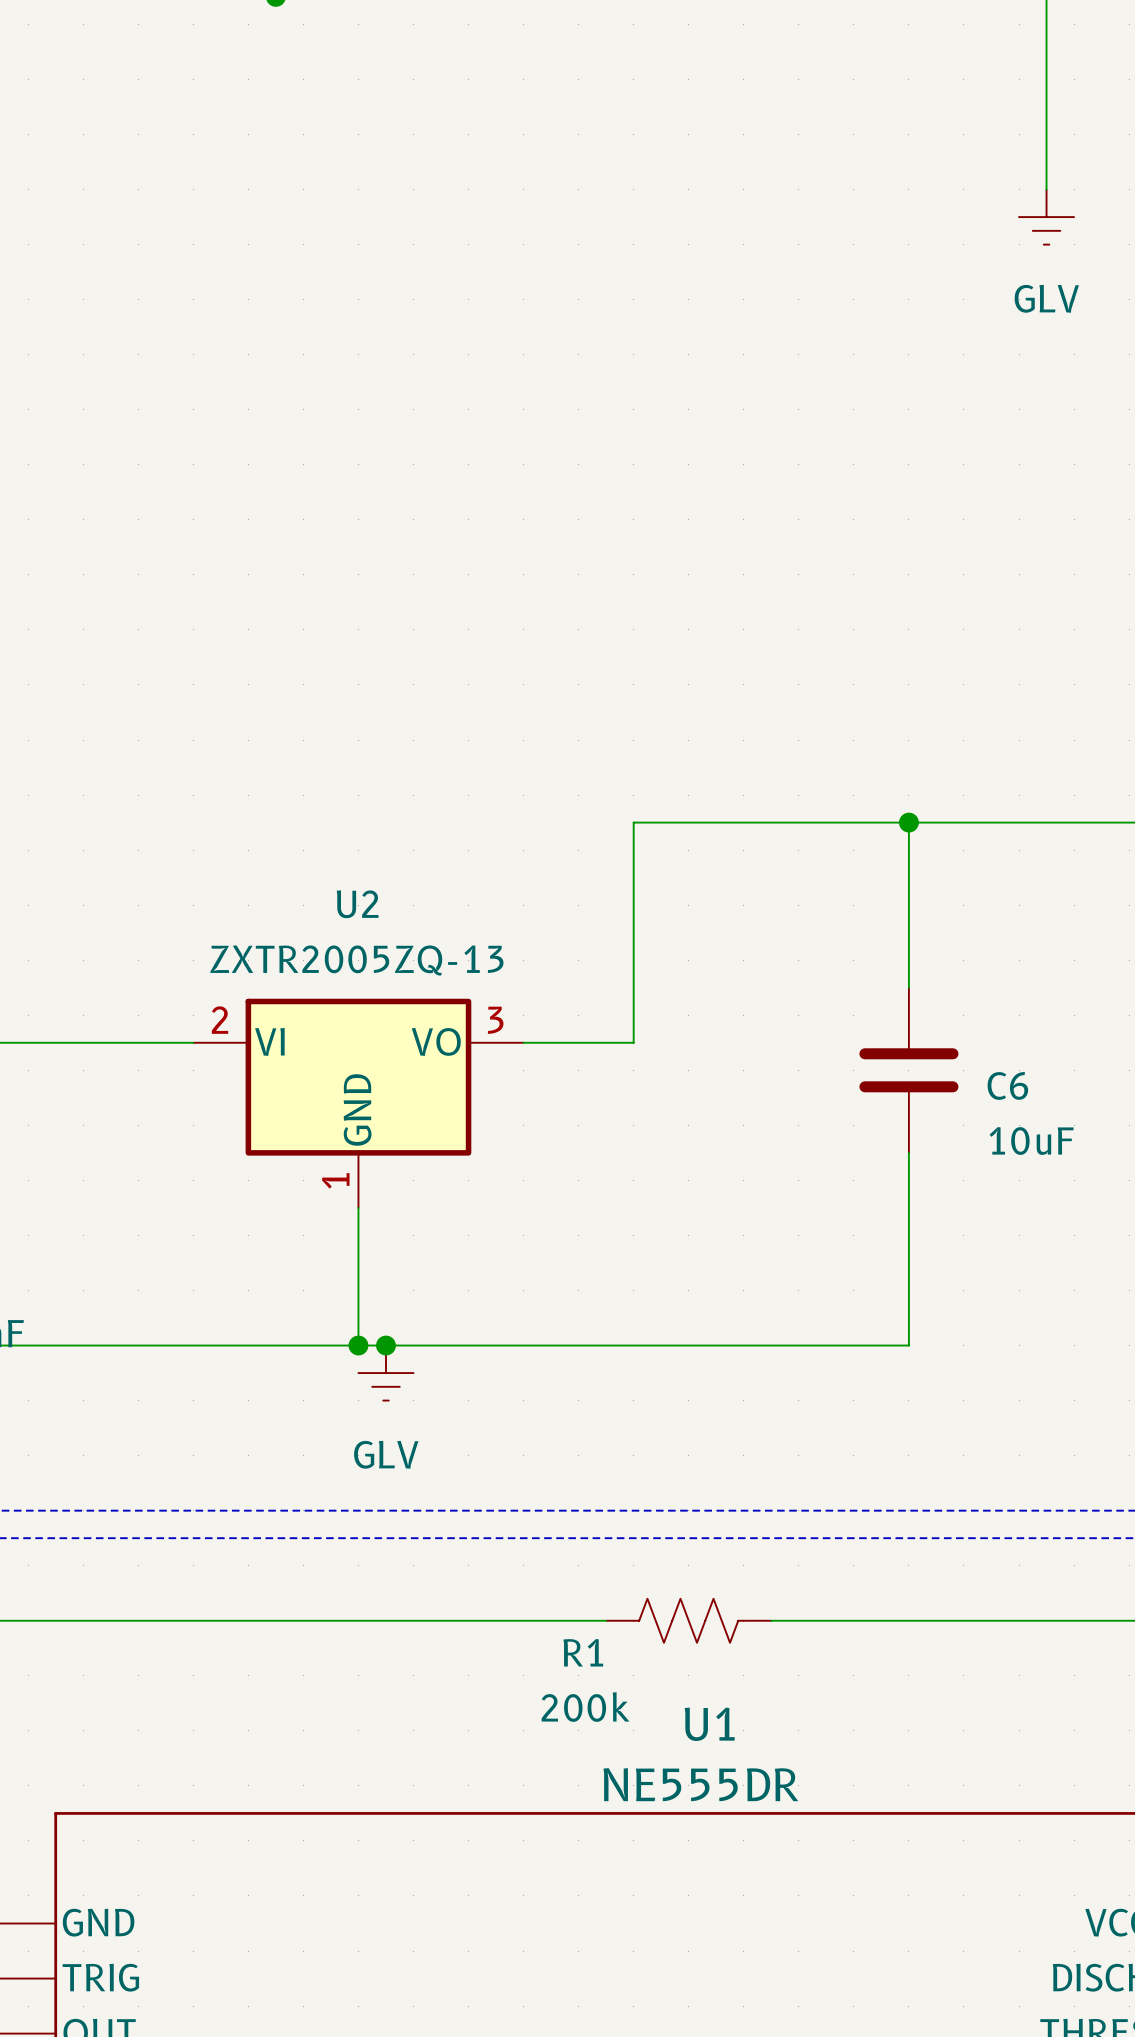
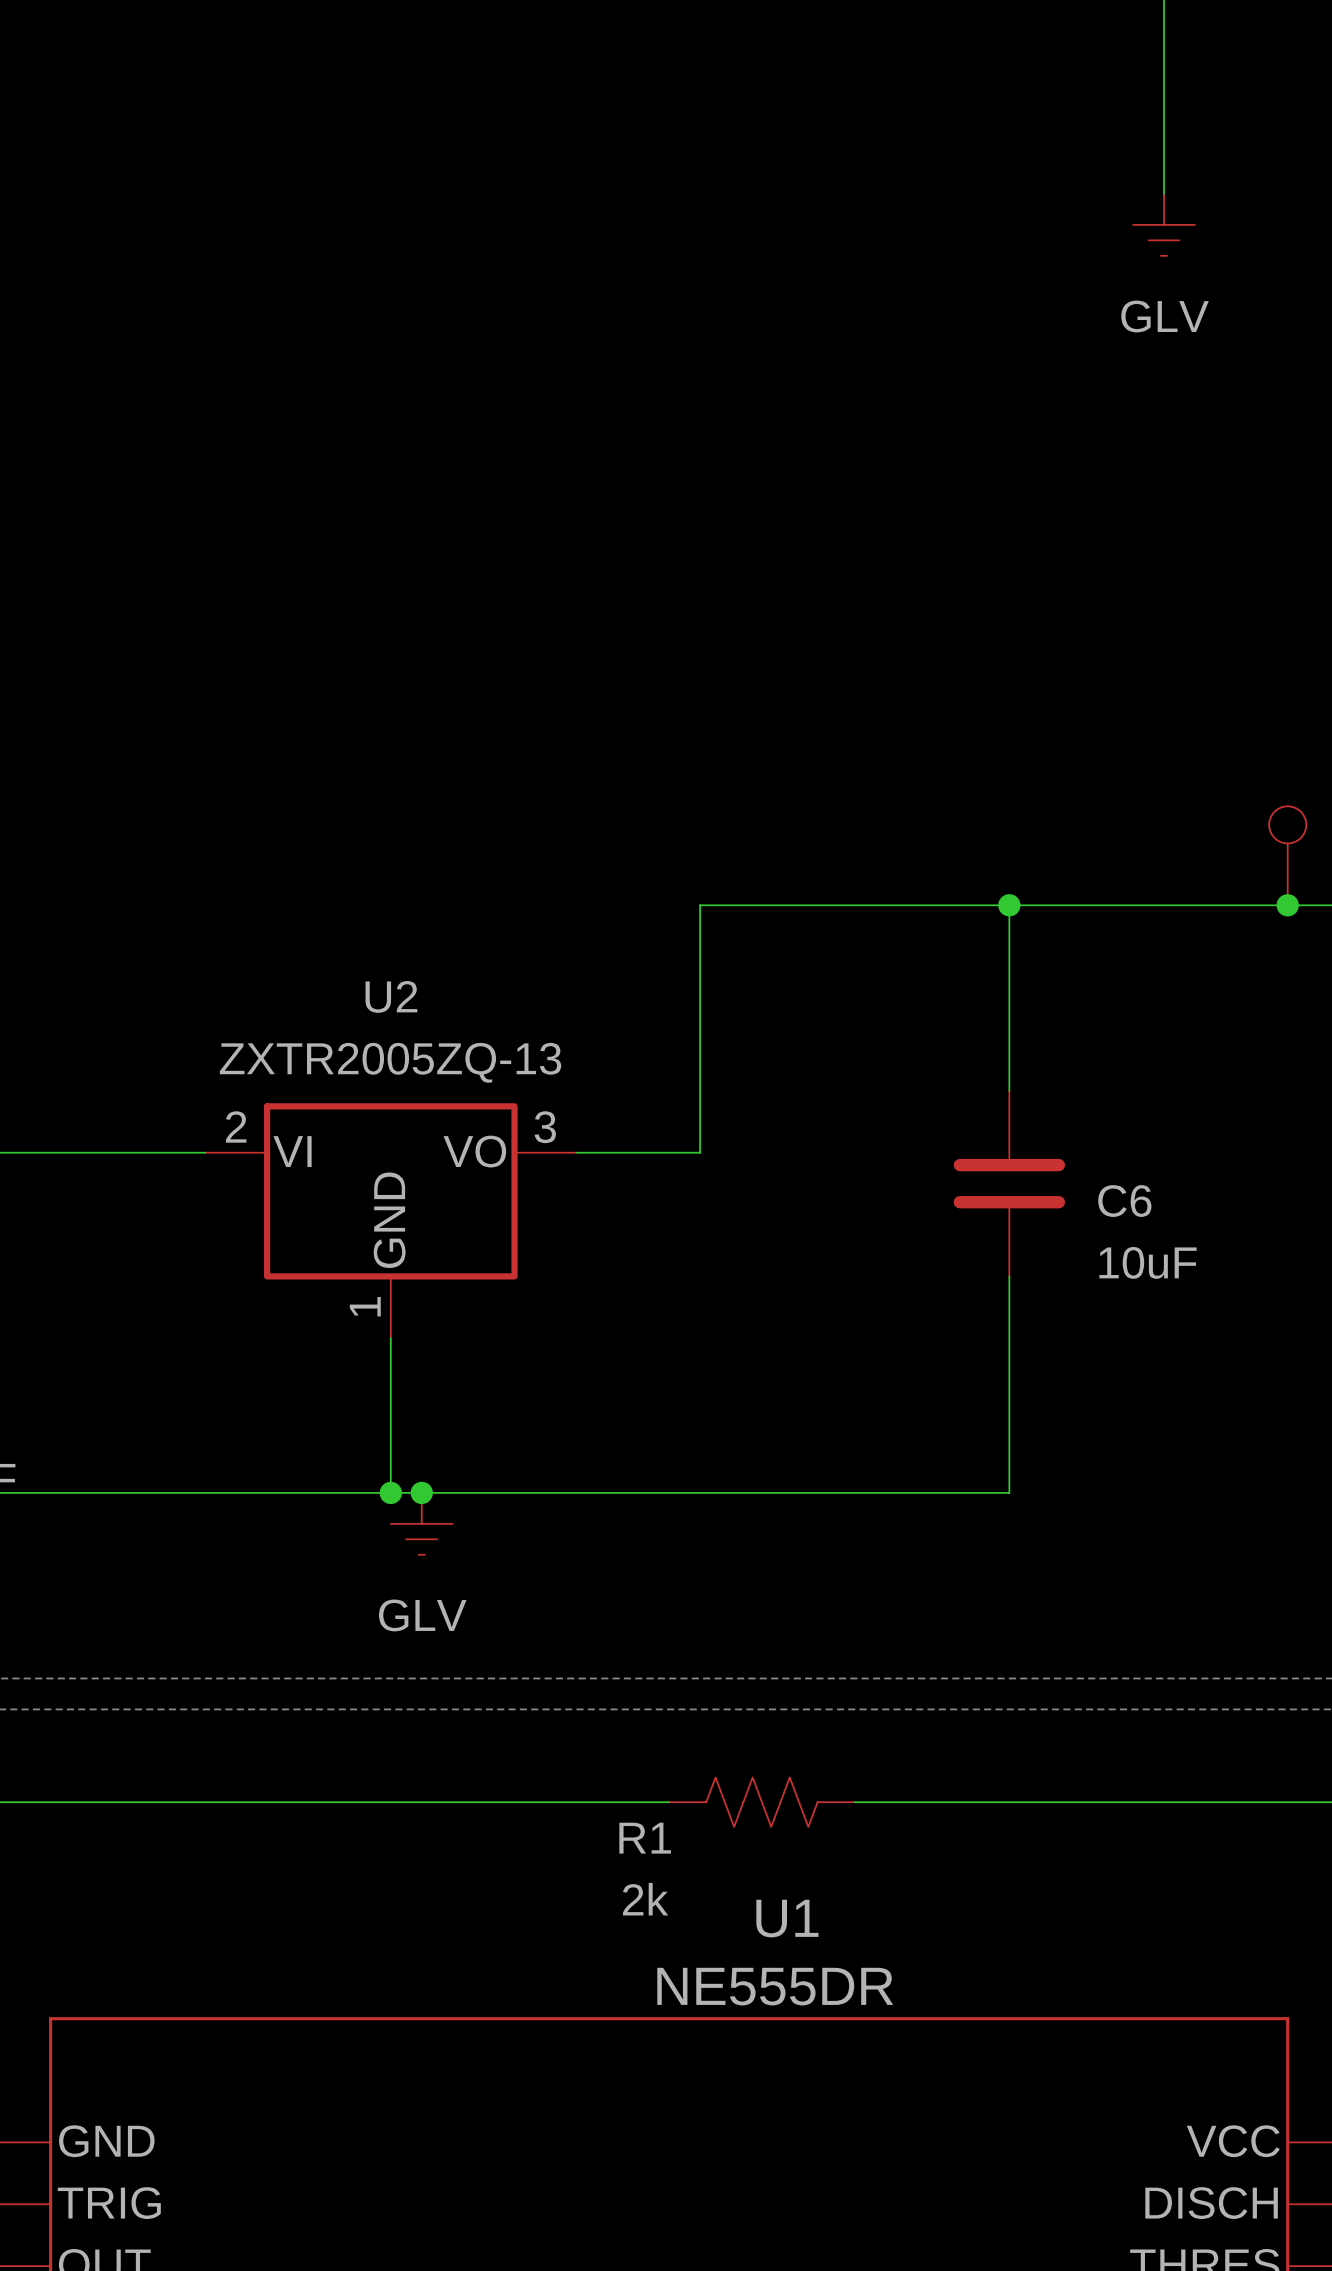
R1 value: 200k (585, 1707) -> 2k (645, 1899)

